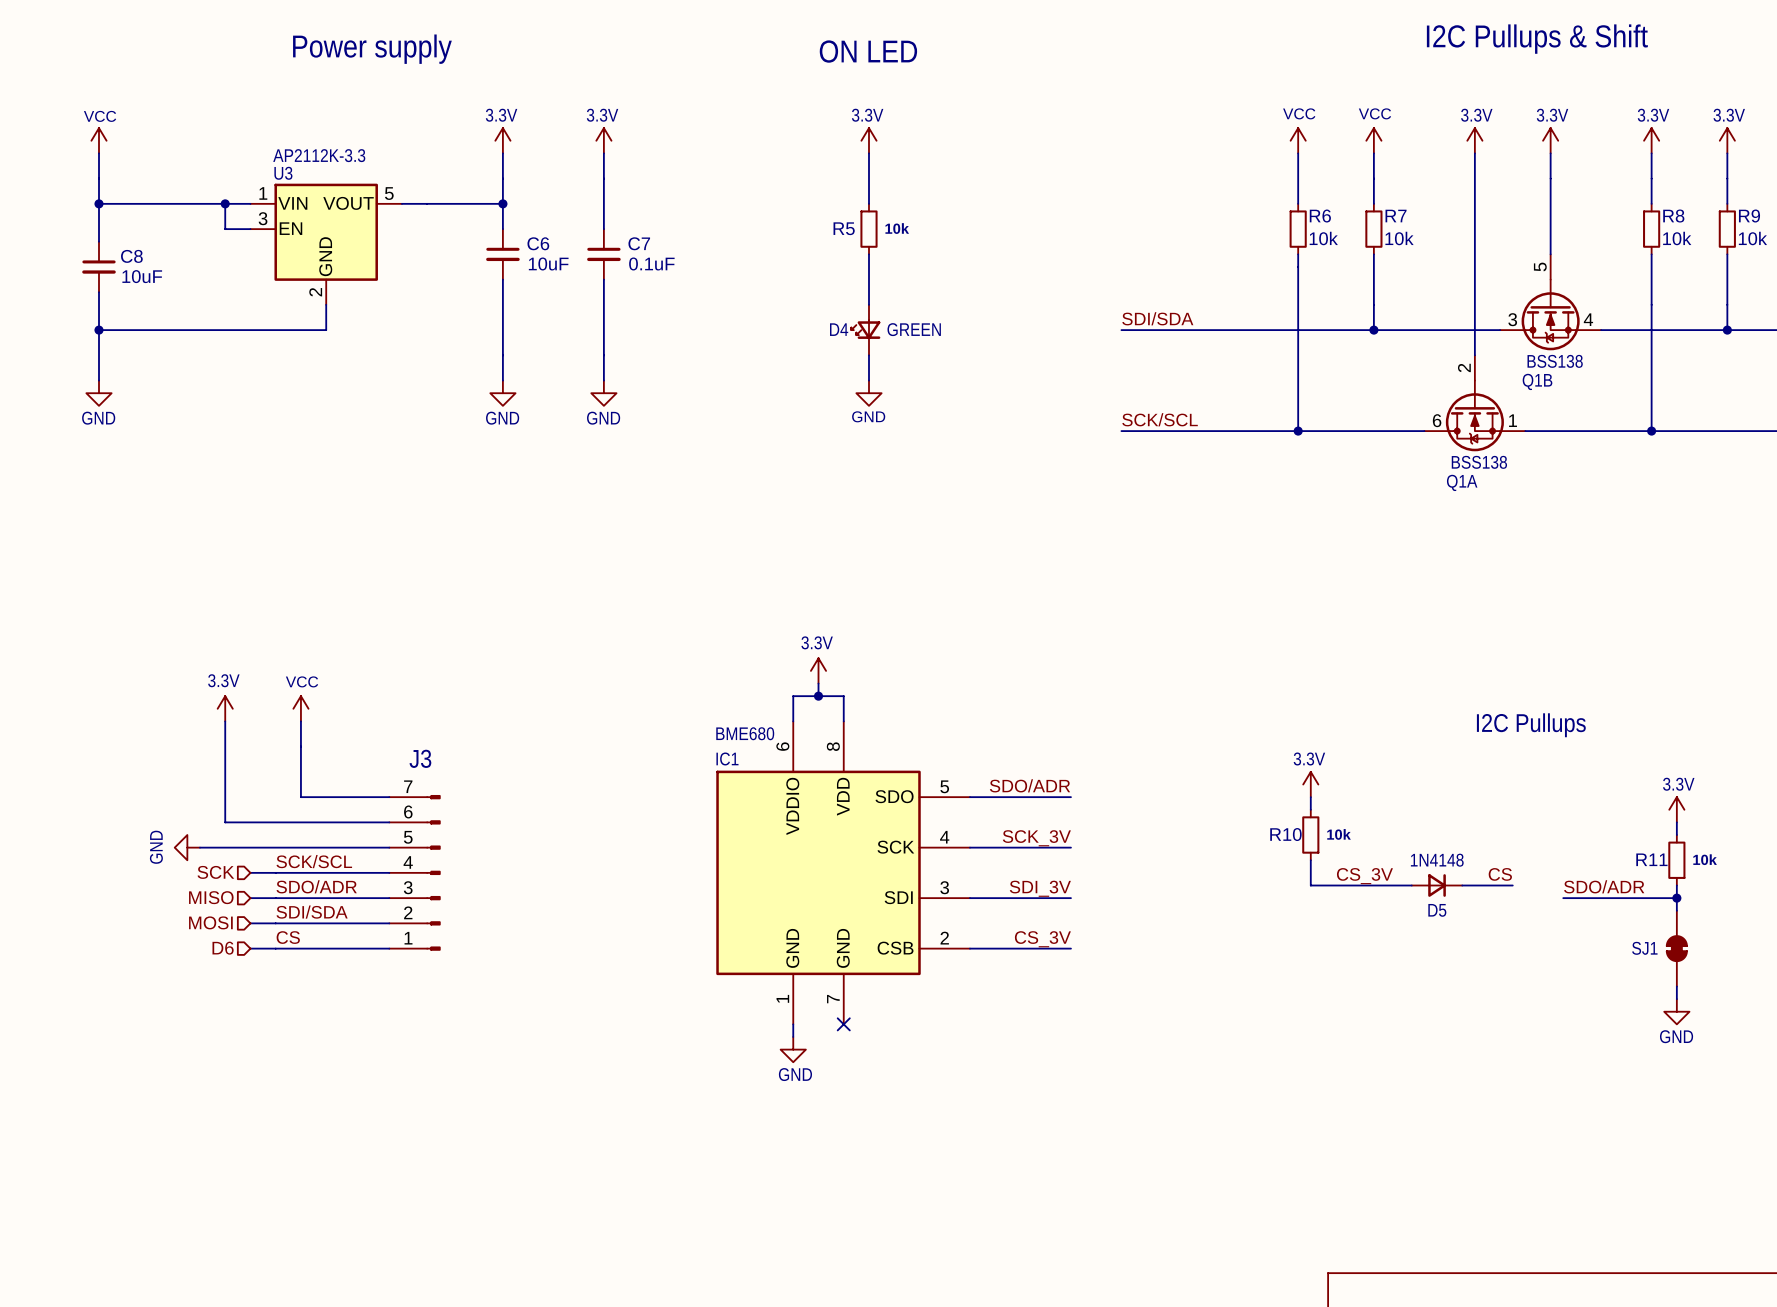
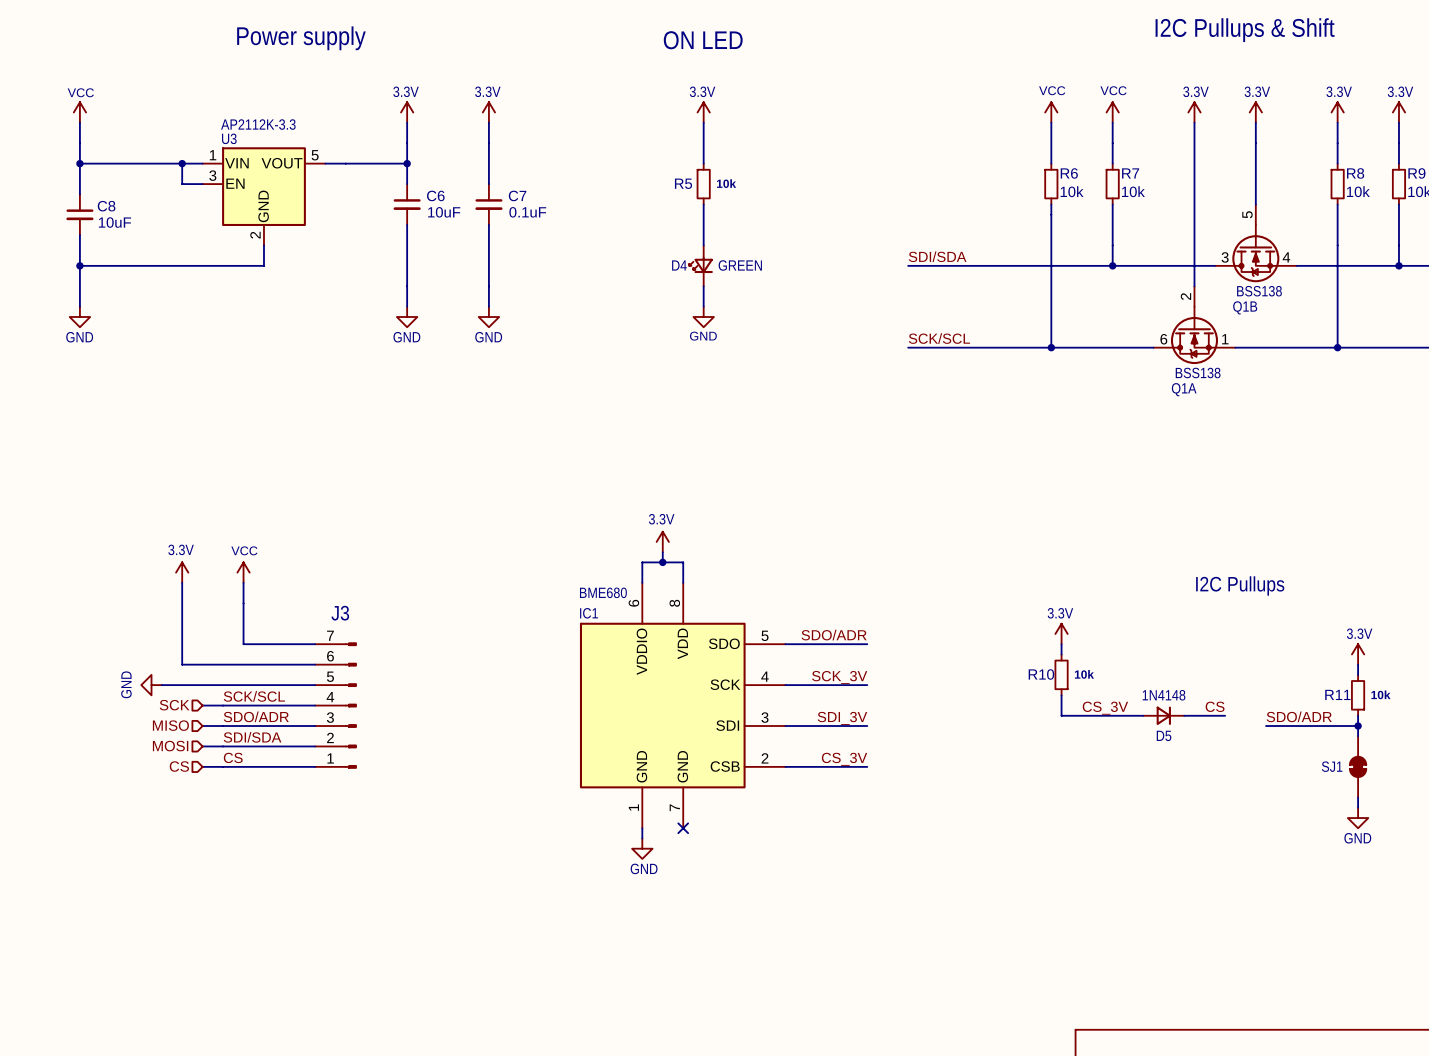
hierarchical label: D6 (223, 948) -> CS (179, 766)

